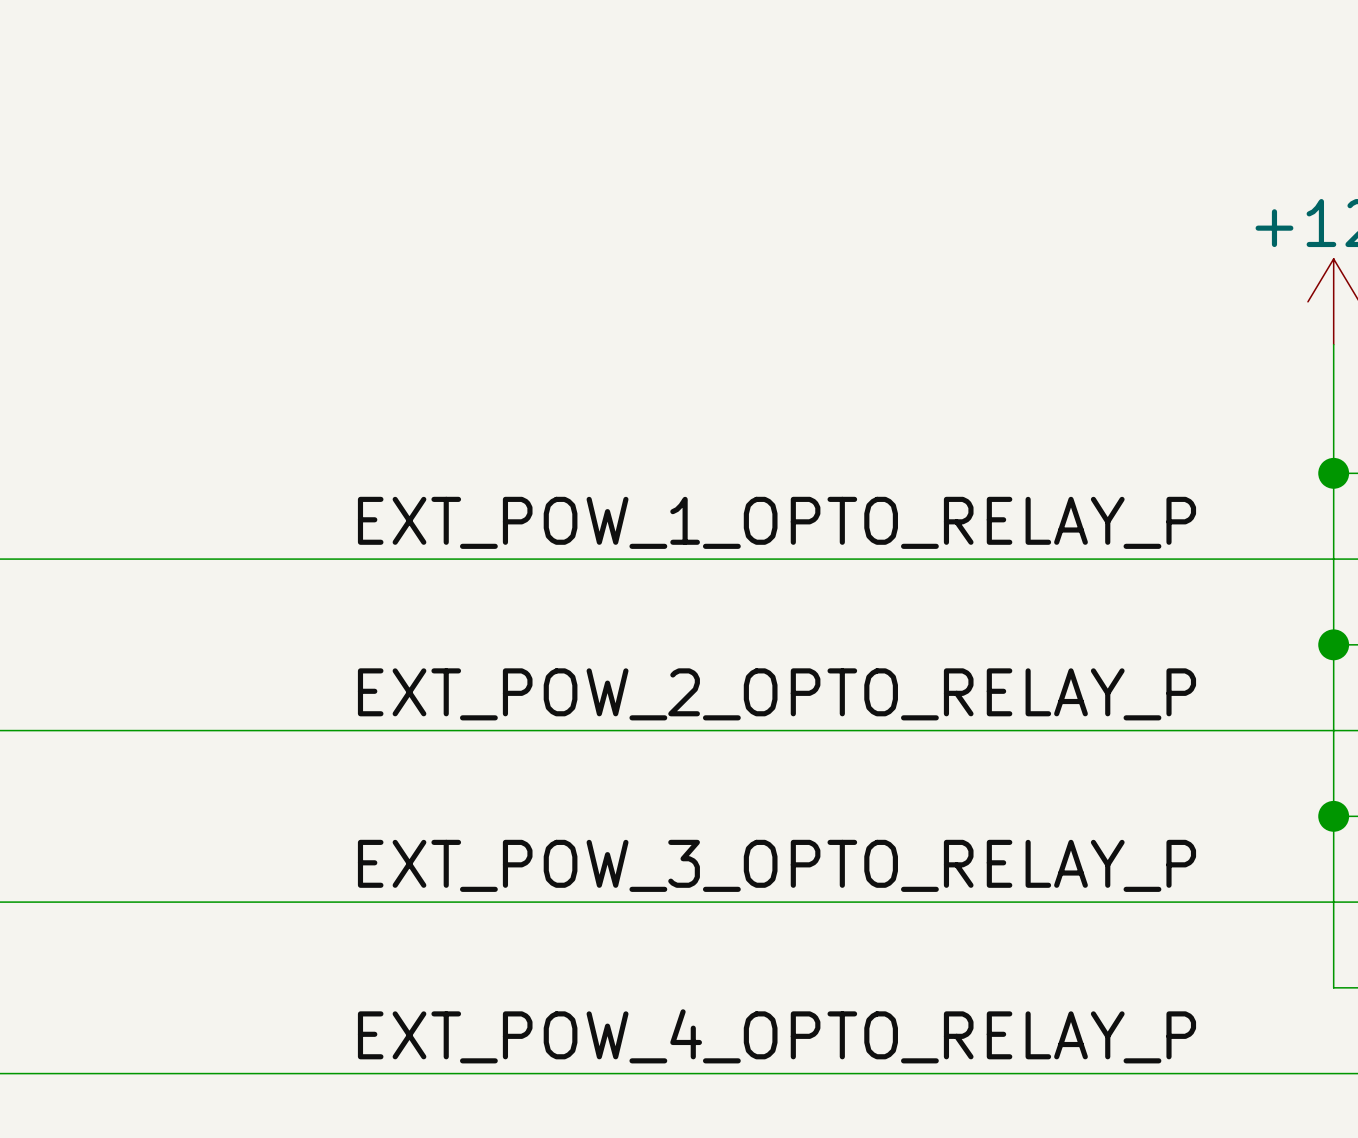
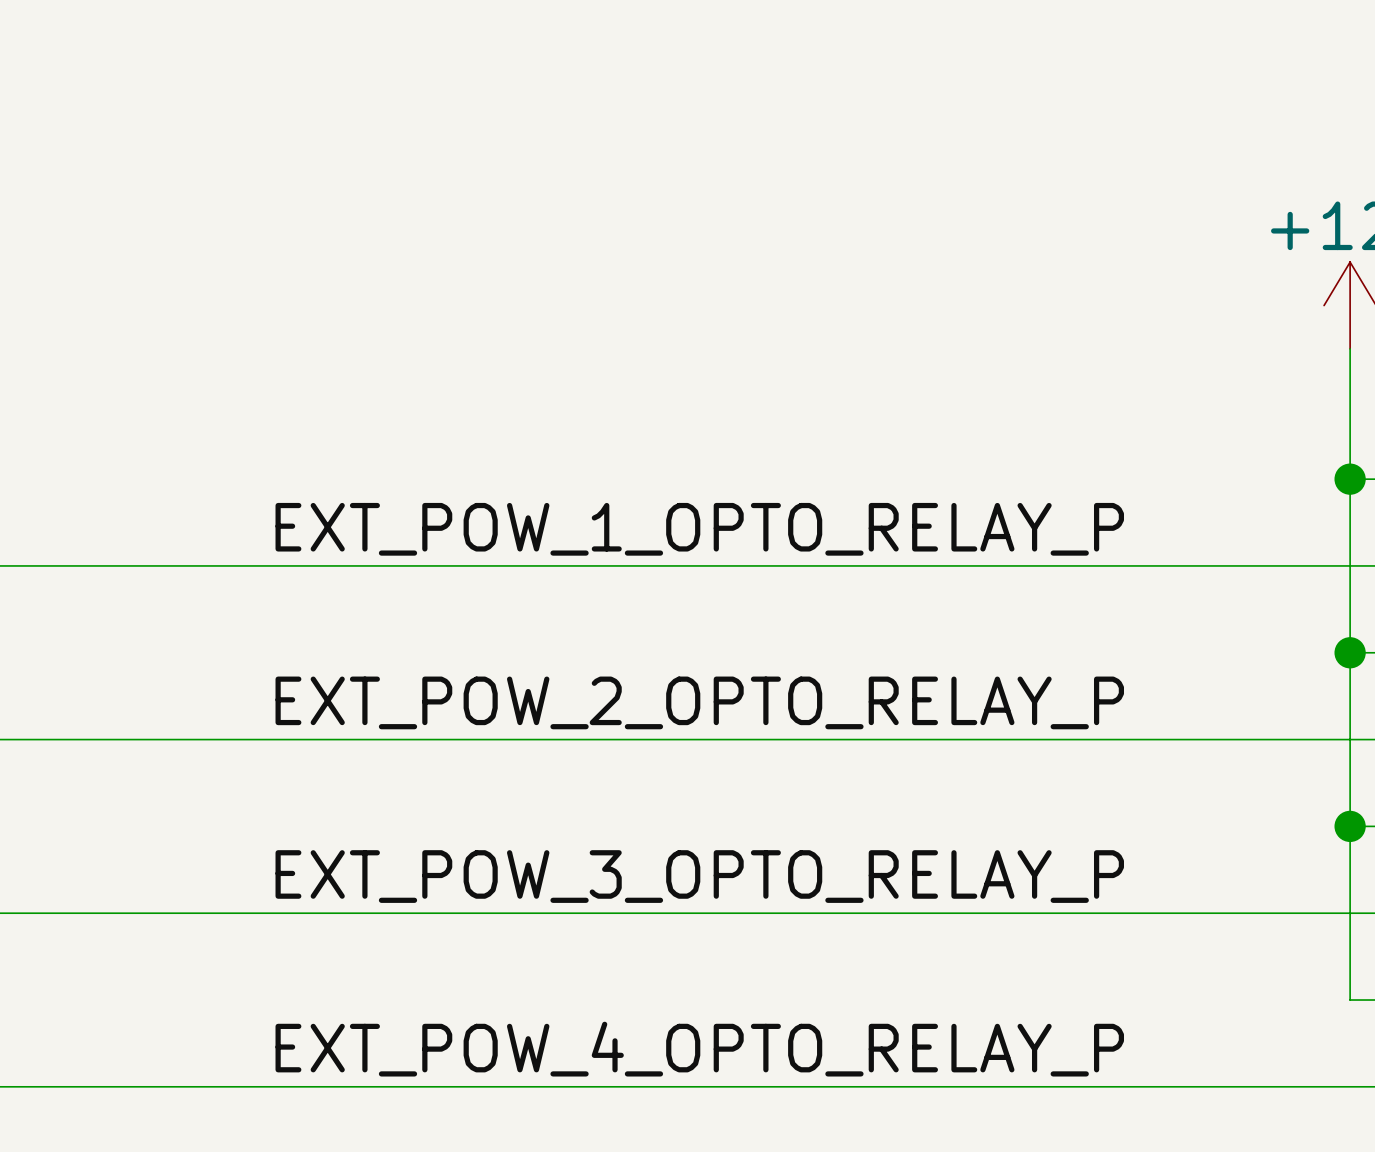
label position: EXT_POW_1_OPTO_RELAY_P (776, 522) -> EXT_POW_1_OPTO_RELAY_P (699, 529)
label position: EXT_POW_2_OPTO_RELAY_P (776, 694) -> EXT_POW_2_OPTO_RELAY_P (699, 702)
label position: EXT_POW_3_OPTO_RELAY_P (776, 865) -> EXT_POW_3_OPTO_RELAY_P (699, 876)
label position: EXT_POW_4_OPTO_RELAY_P (776, 1036) -> EXT_POW_4_OPTO_RELAY_P (699, 1049)

